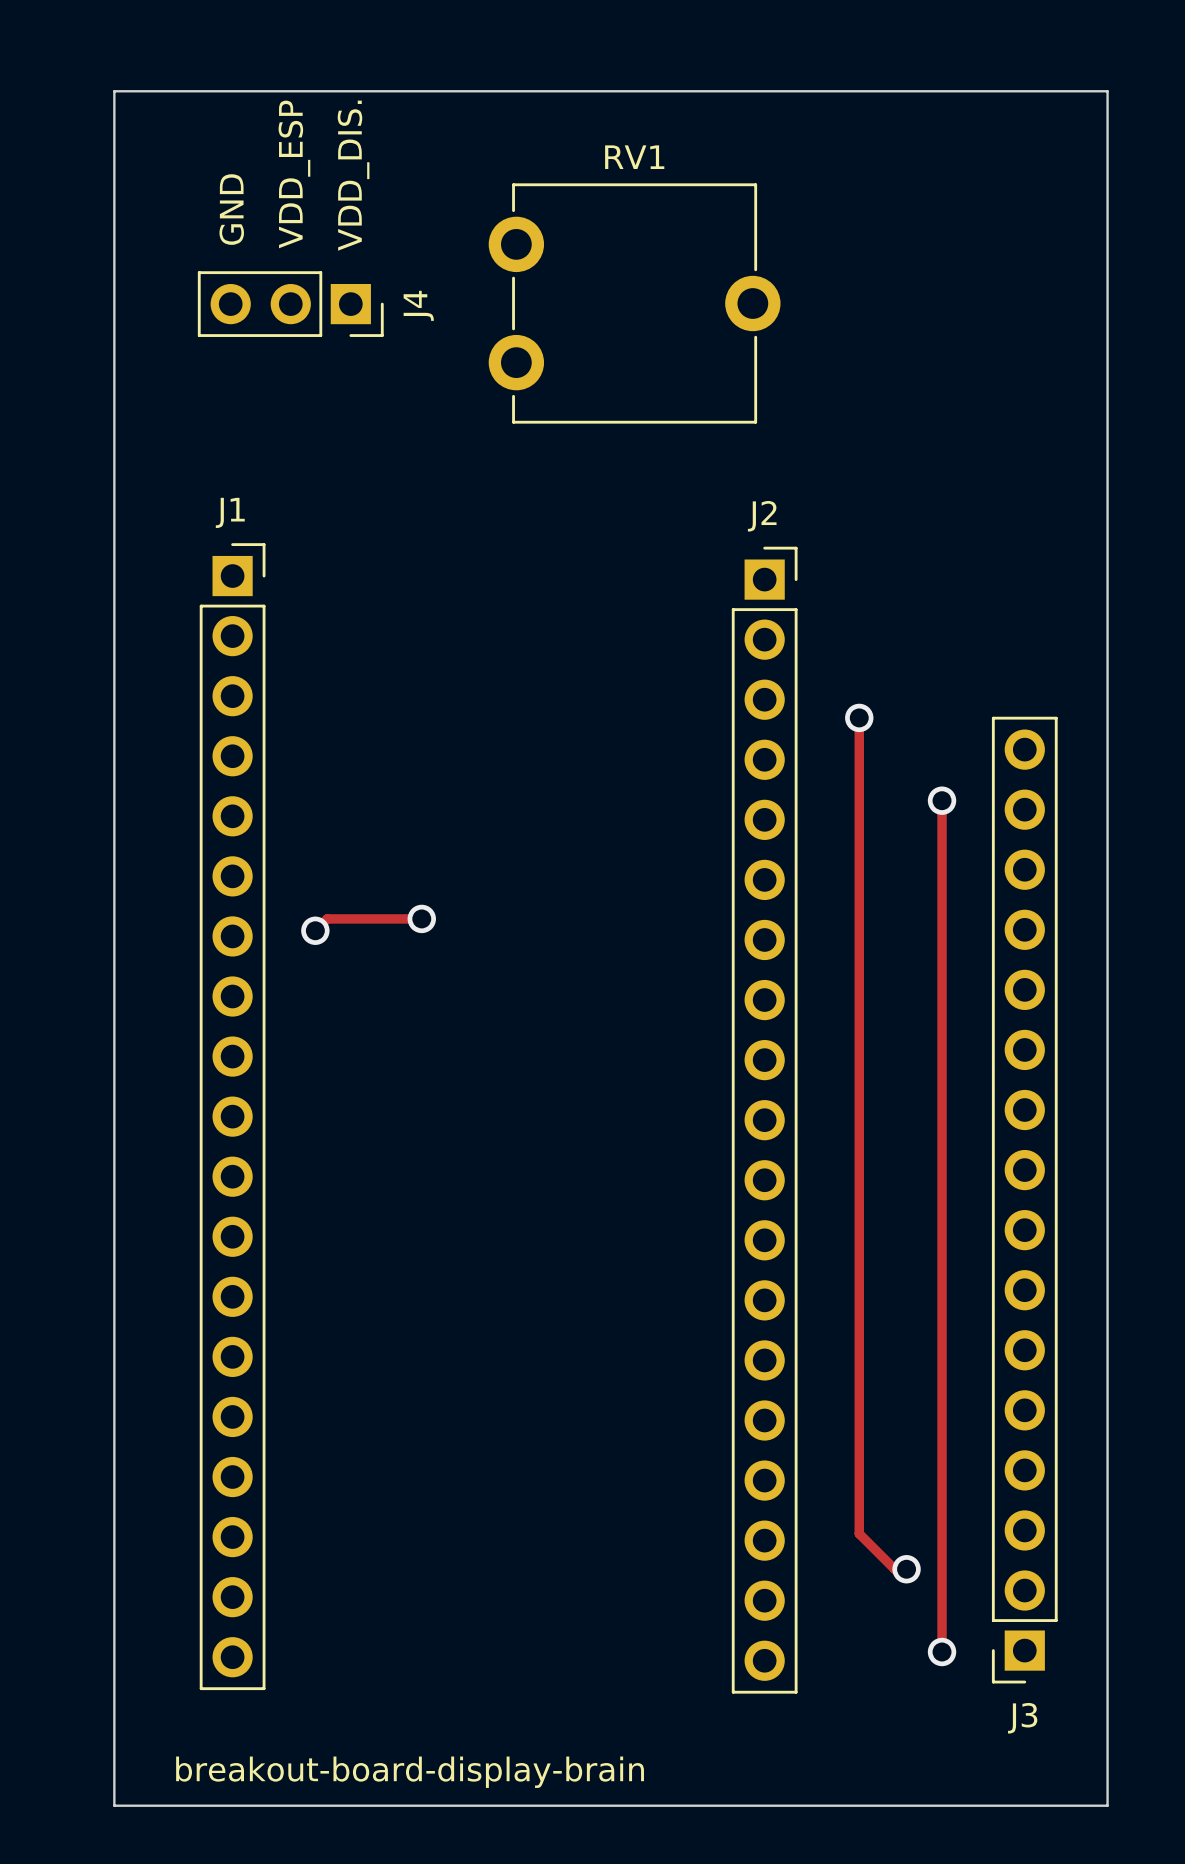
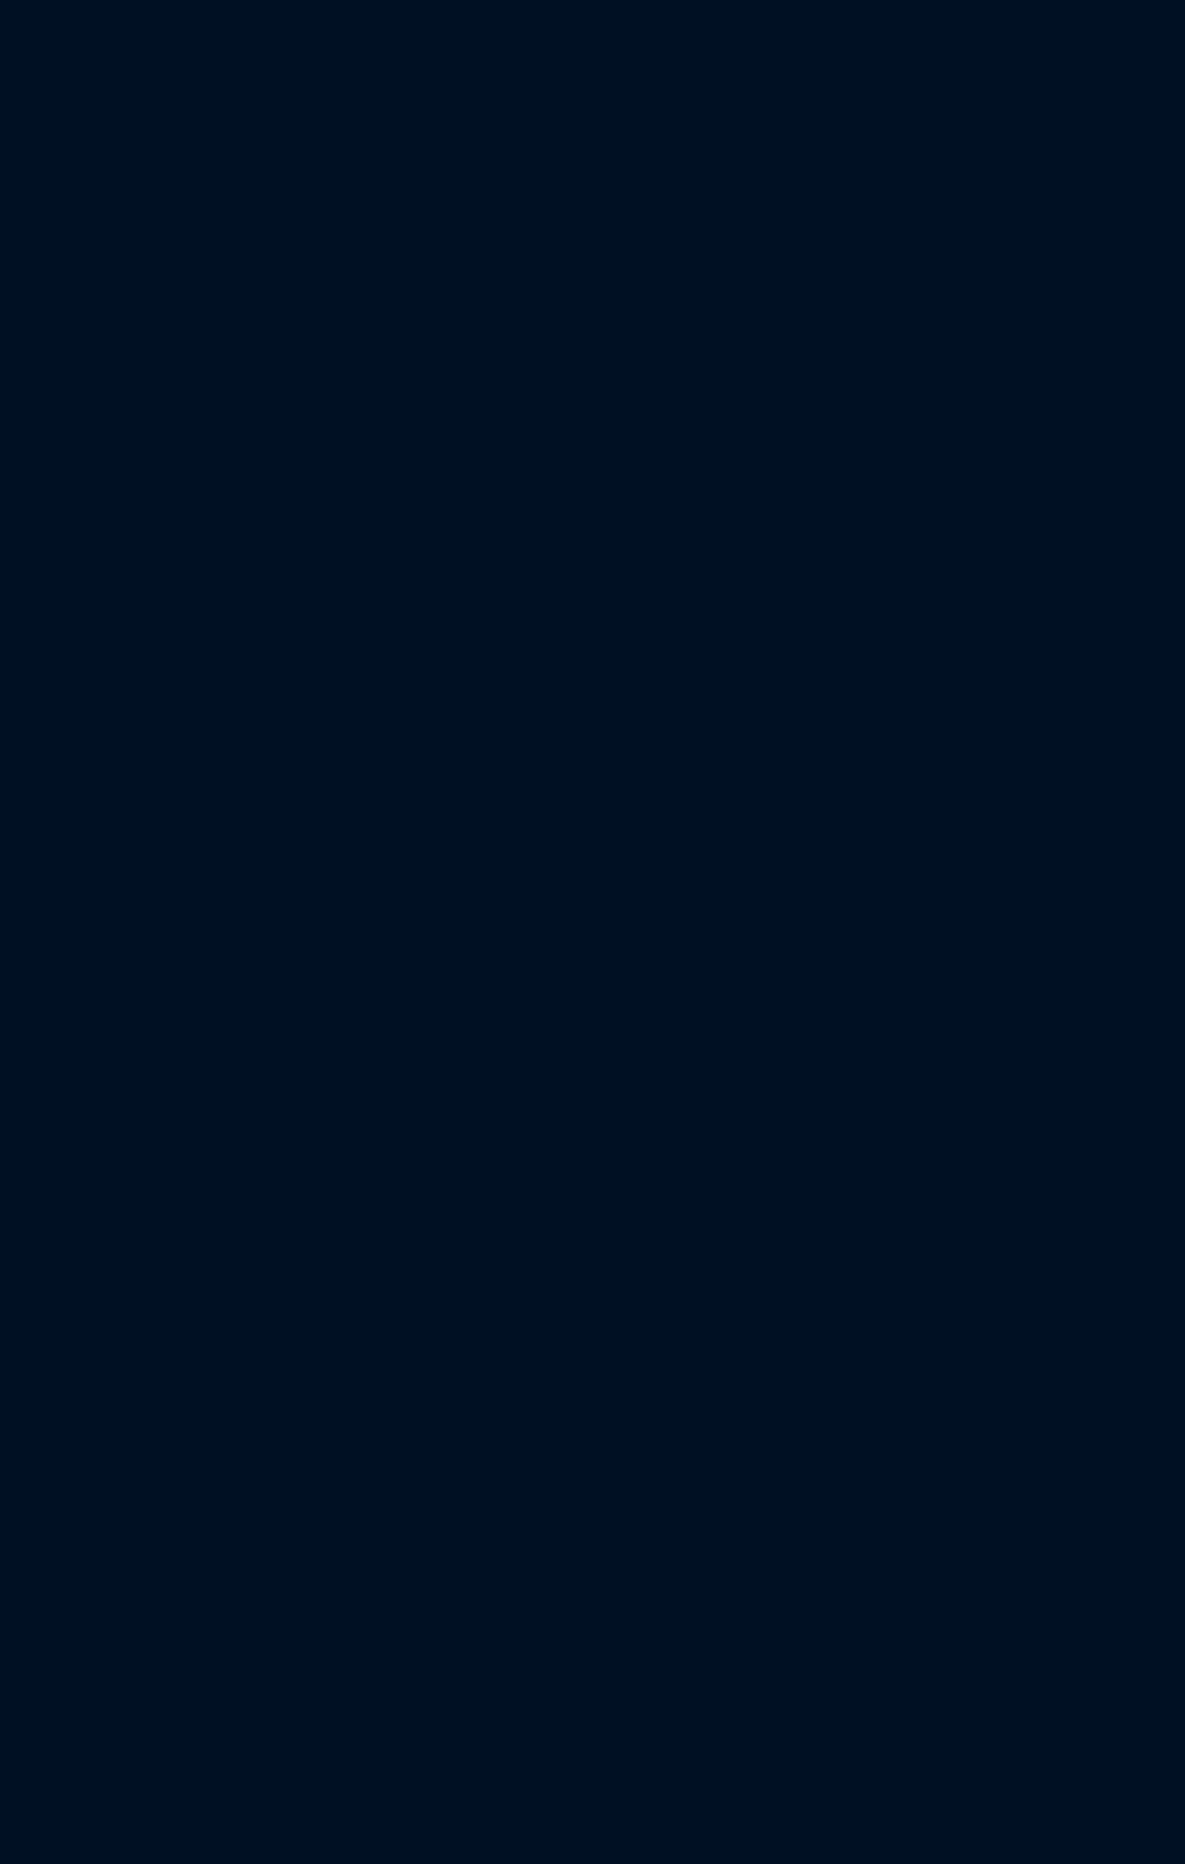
board edge: (114, 91) (1107, 91) (1107, 1805) (114, 1805) (114, 91) -> none
text: VDD_ESP (294, 174) -> none
text: VDD_DIS. (353, 175) -> none
text: GND (231, 209) -> none
RV1: (634, 303) -> none
J4: (290, 304) -> none
track: (859, 717) (859, 1533) (894, 1569) (906, 1569) -> none
via: (859, 717) -> none
track: (942, 800) (942, 1652) -> none
via: (942, 800) -> none
track: (421, 918) (327, 918) (315, 930) -> none
via: (421, 918) -> none
via: (315, 930) -> none
J1: (232, 1116) -> none
J2: (764, 1120) -> none
J3: (1024, 1200) -> none
via: (906, 1569) -> none
via: (942, 1652) -> none
text: breakout-board-display-brain (410, 1772) -> none

